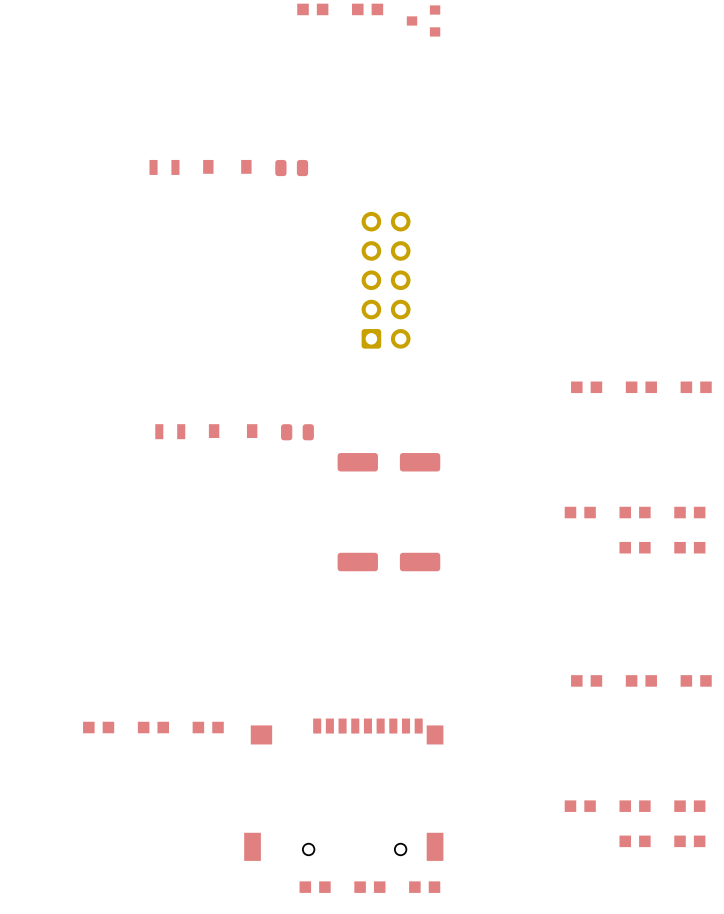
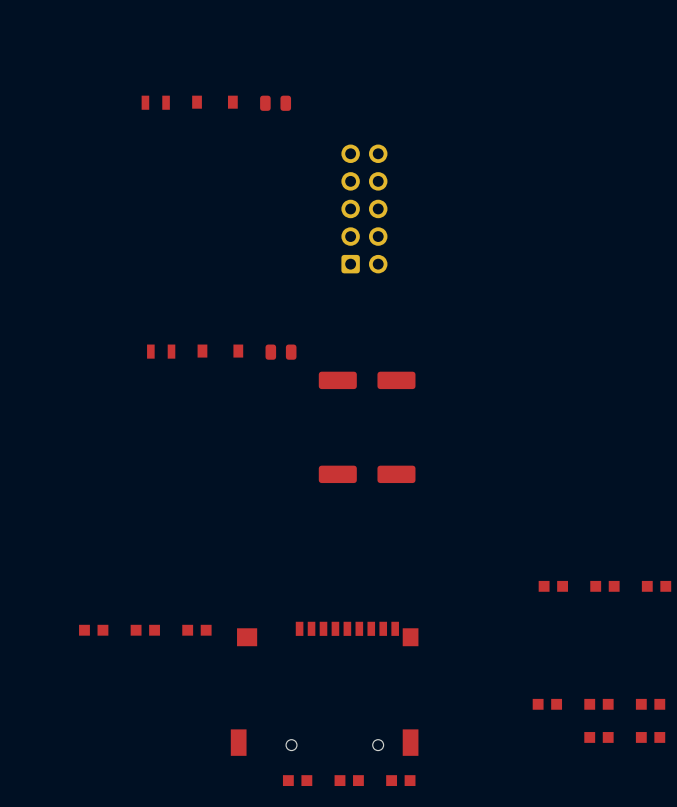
part: (586, 387) -> none
part: (641, 387) -> none
part: (696, 387) -> none
part: (580, 512) -> none
part: (635, 512) -> none
part: (689, 512) -> none
part: (635, 547) -> none
part: (689, 547) -> none

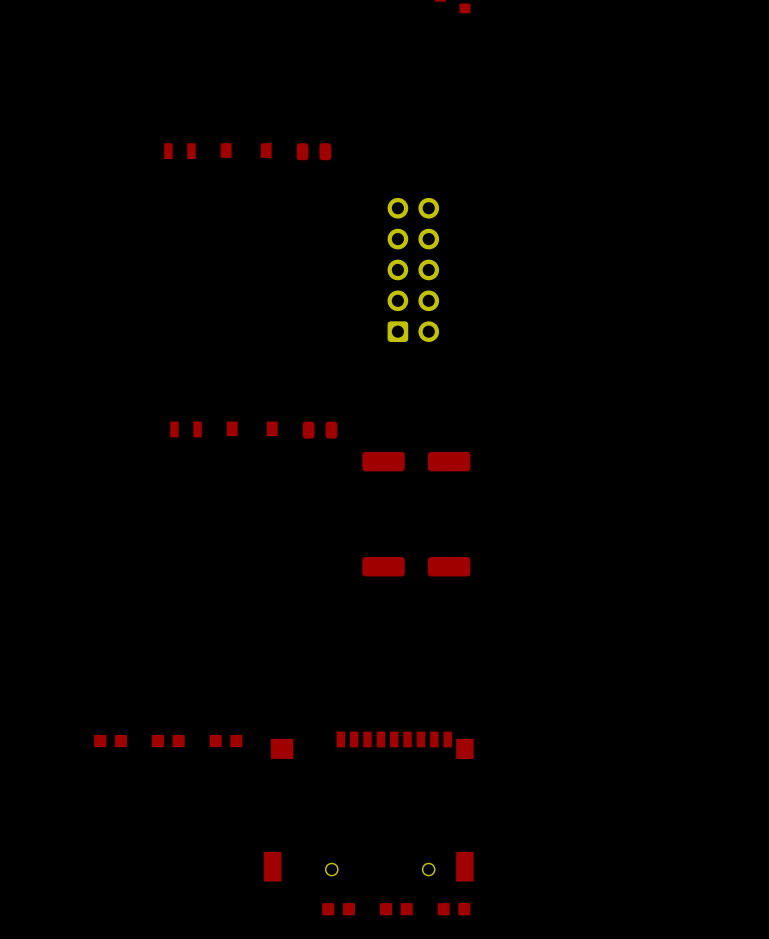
part: (553, 586) -> none
part: (604, 586) -> none
part: (656, 586) -> none
part: (547, 704) -> none
part: (598, 704) -> none
part: (650, 704) -> none
part: (598, 737) -> none
part: (650, 737) -> none

